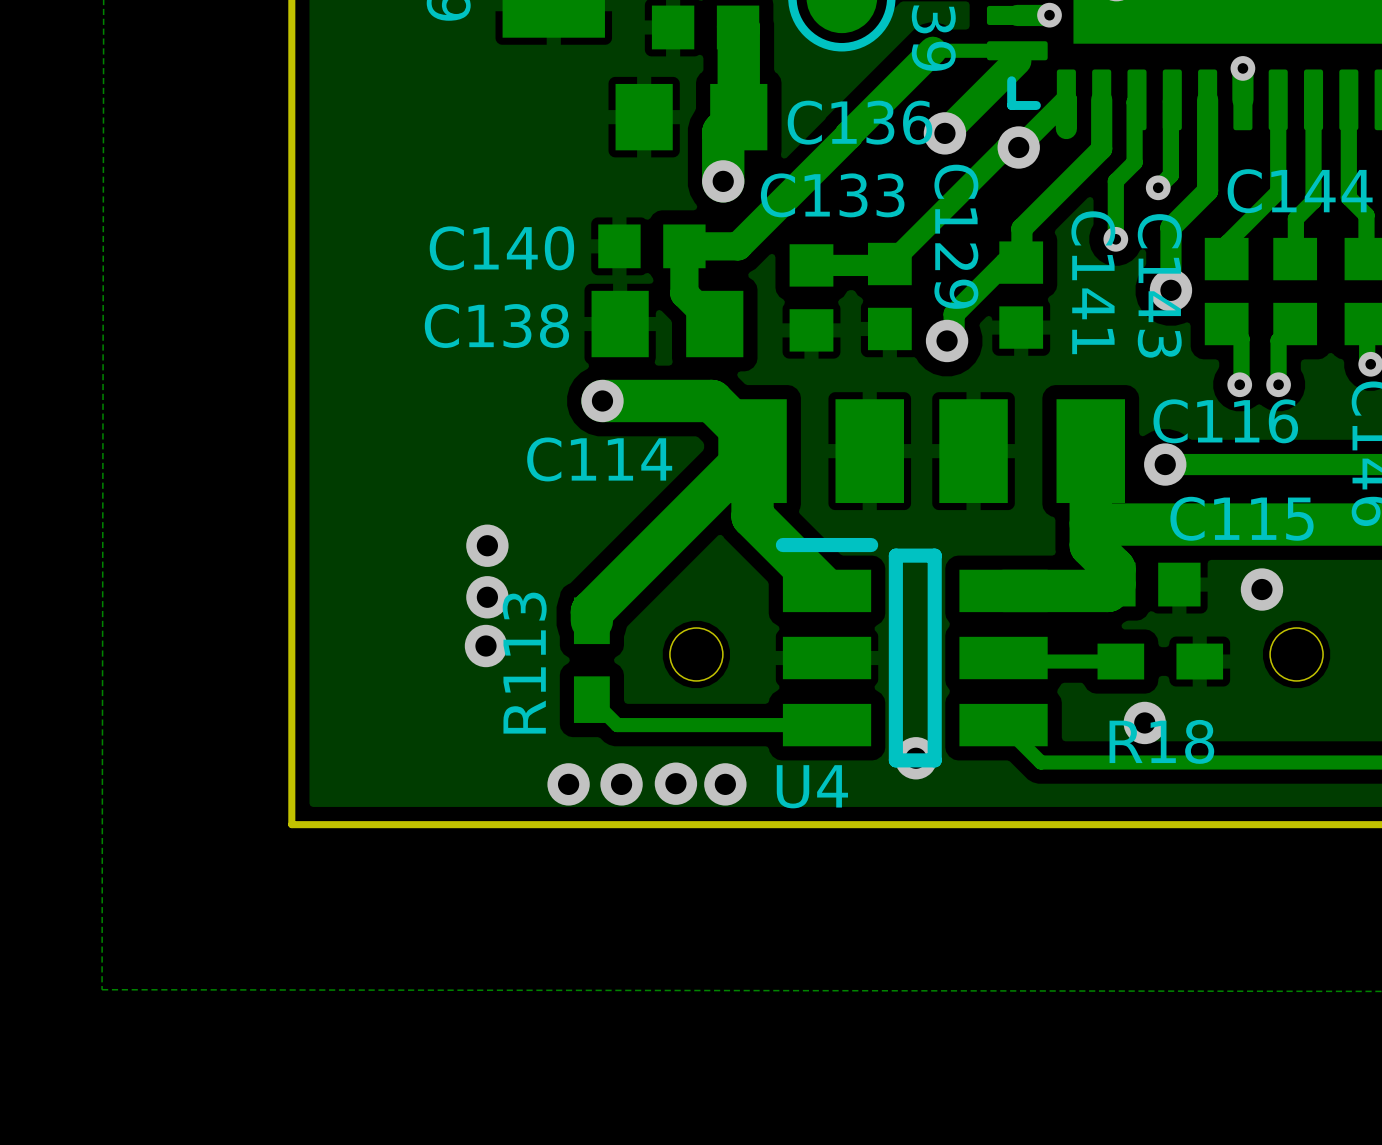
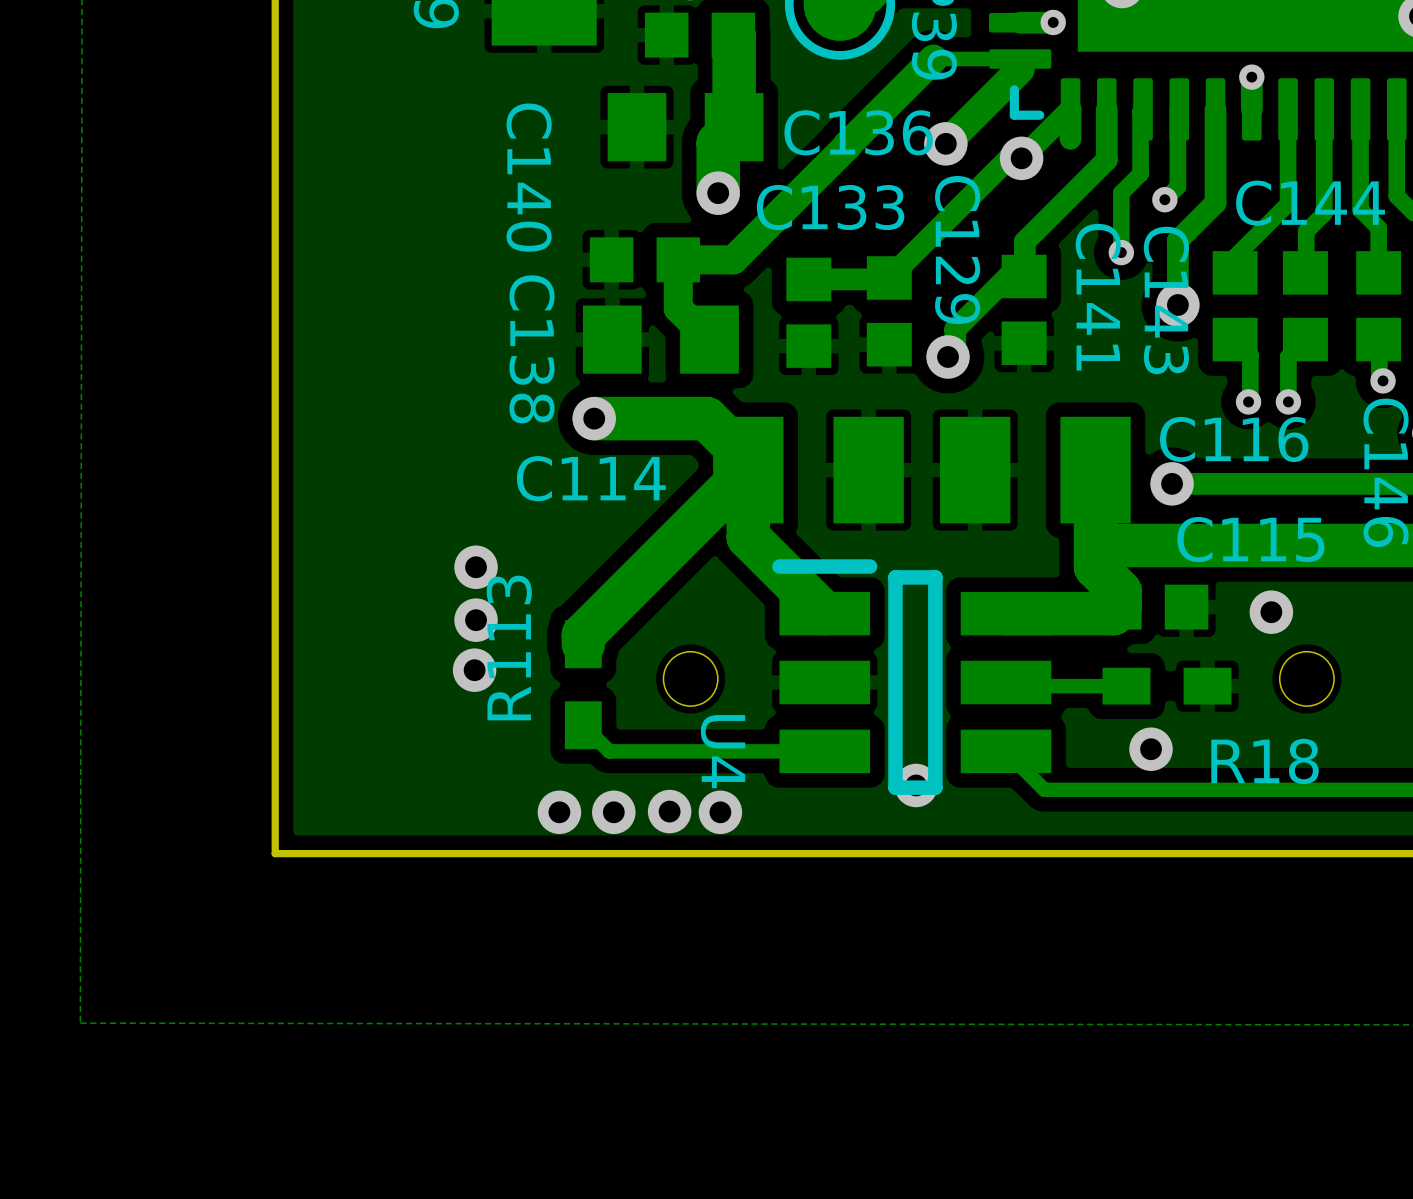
C140 name rotation: 0° (501, 248) -> 90° clockwise (529, 177)
C138 name rotation: 0° (496, 326) -> 90° clockwise (532, 349)
R113 name position: R113 (524, 663) -> R113 (509, 648)
R18 name position: R18 (1161, 741) -> R18 (1265, 761)
U4 name rotation: 0° (812, 786) -> 90° clockwise (723, 751)
U4 name position: U4 (812, 786) -> U4 (723, 751)

